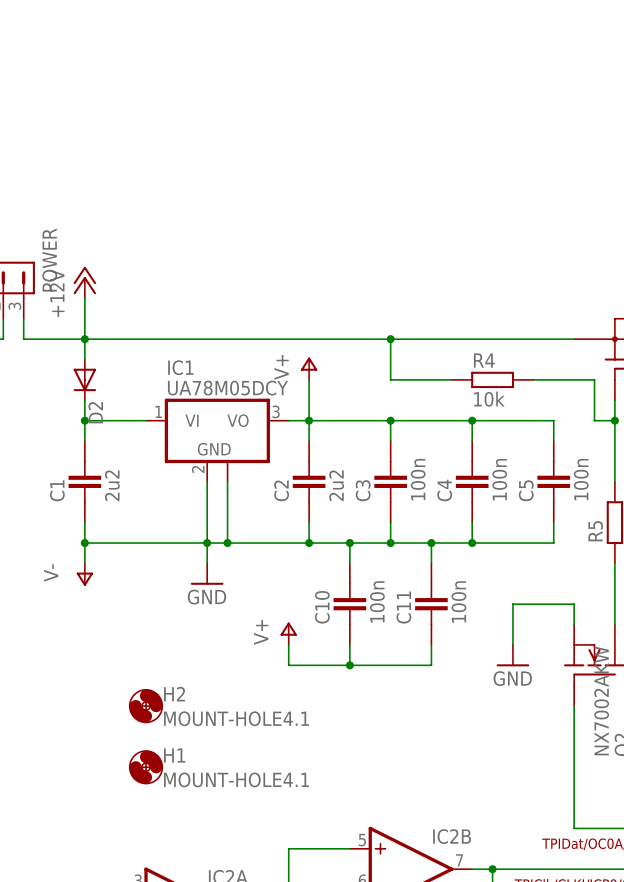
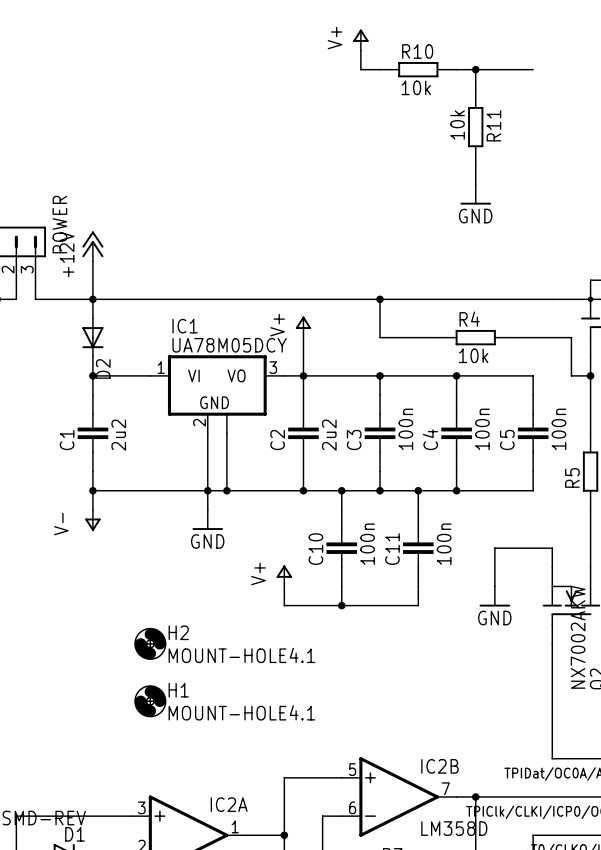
power symbol: none -> V+ (360, 40)
wire: none -> (360, 50) (360, 69) (380, 69)
R10: none -> 10k (418, 69)
wire: none -> (456, 69) (533, 69)
wire: none -> (475, 69) (475, 88)
junction: none -> (475, 69)
R11: none -> 10k (475, 127)
wire: none -> (475, 165) (475, 184)
power symbol: none -> GND (475, 194)

